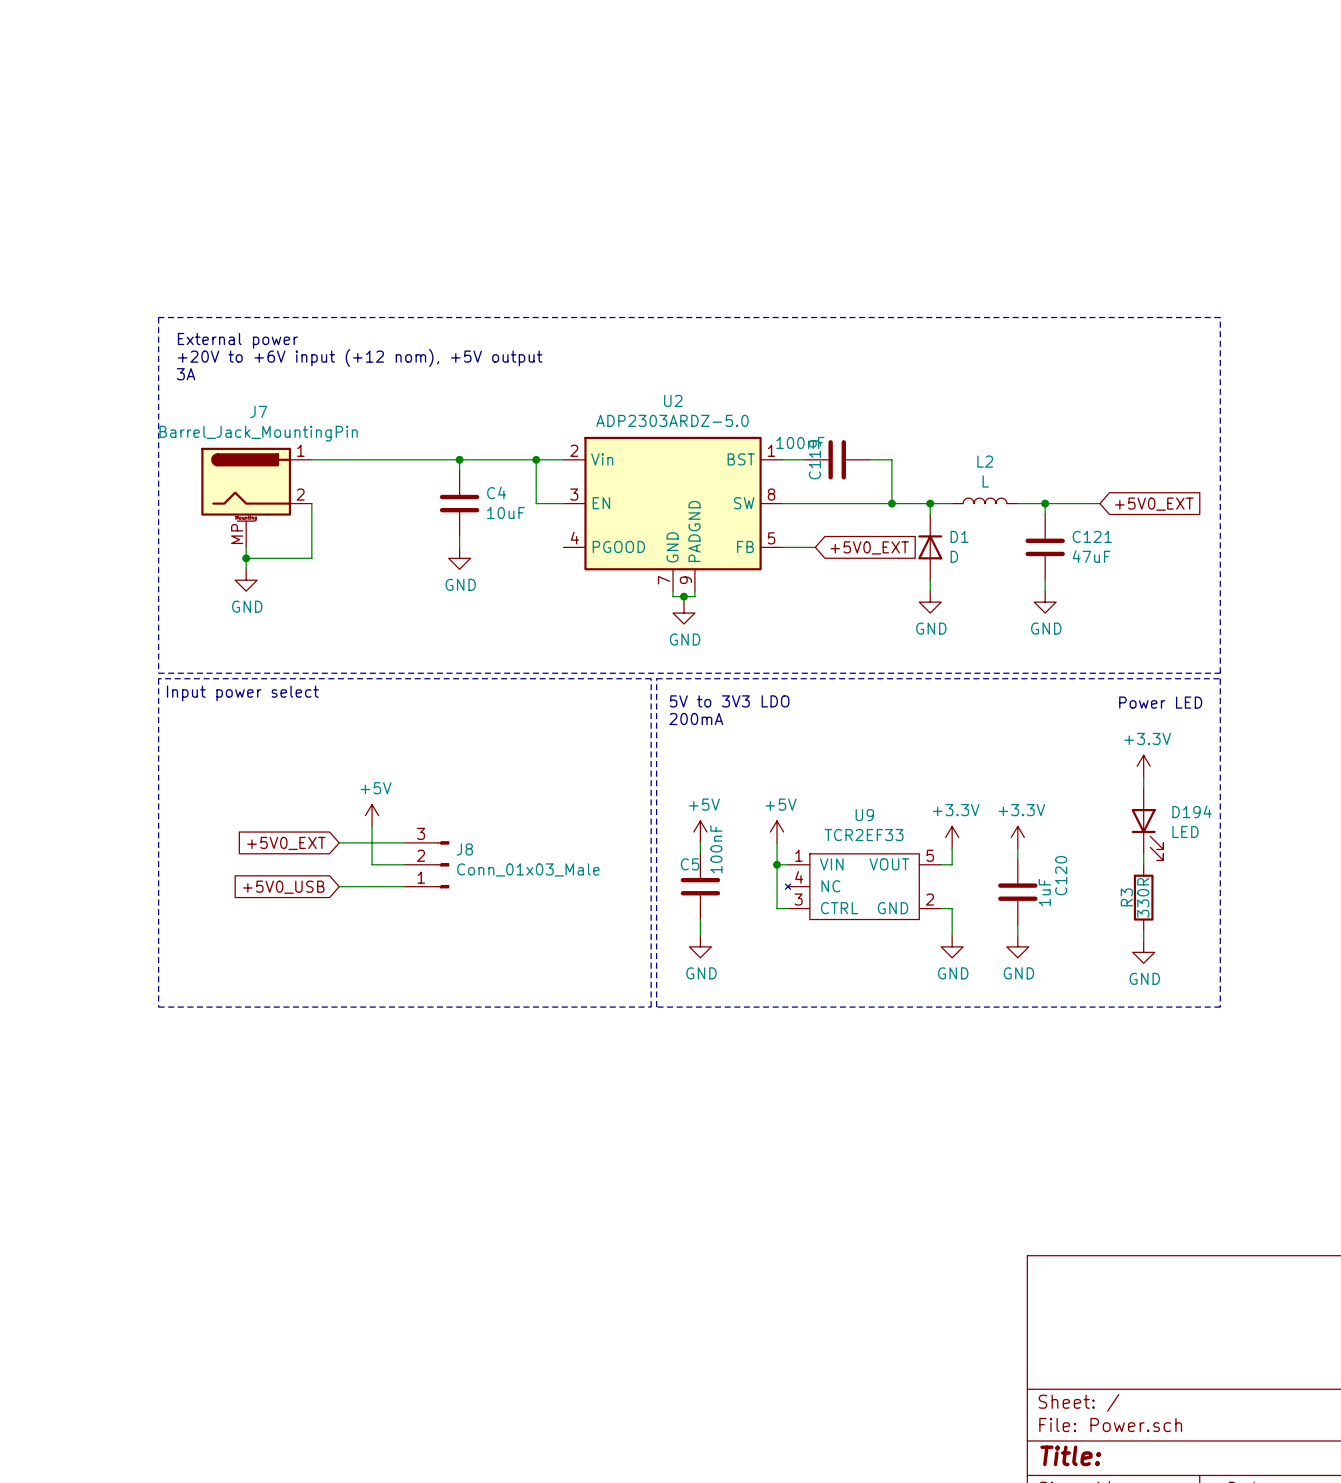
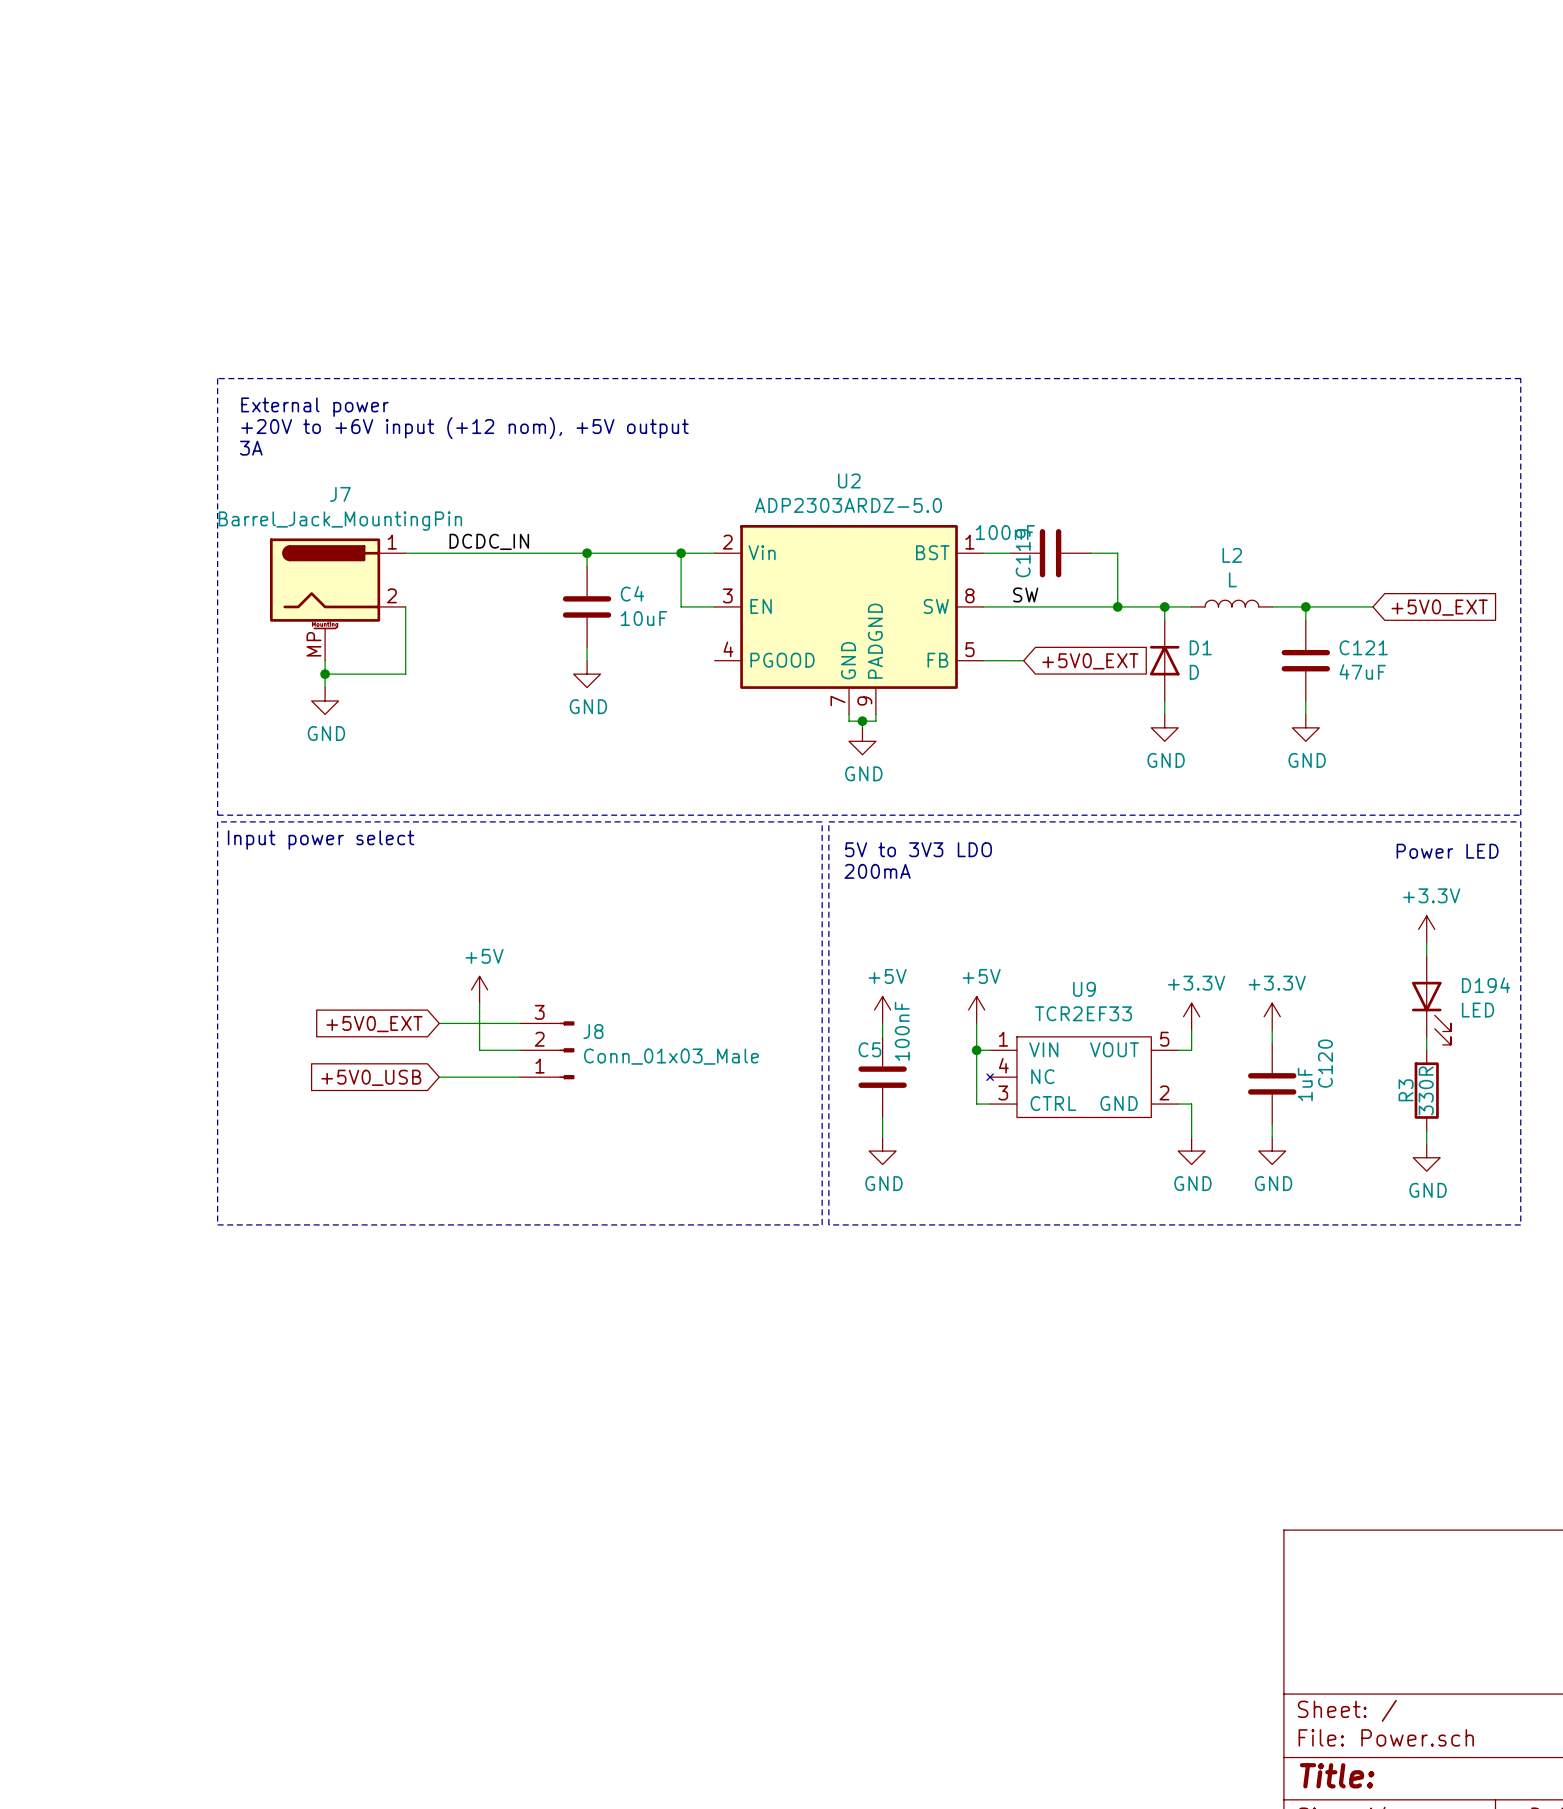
label: none -> DCDC_IN (489, 541)
label: none -> SW (1025, 594)

